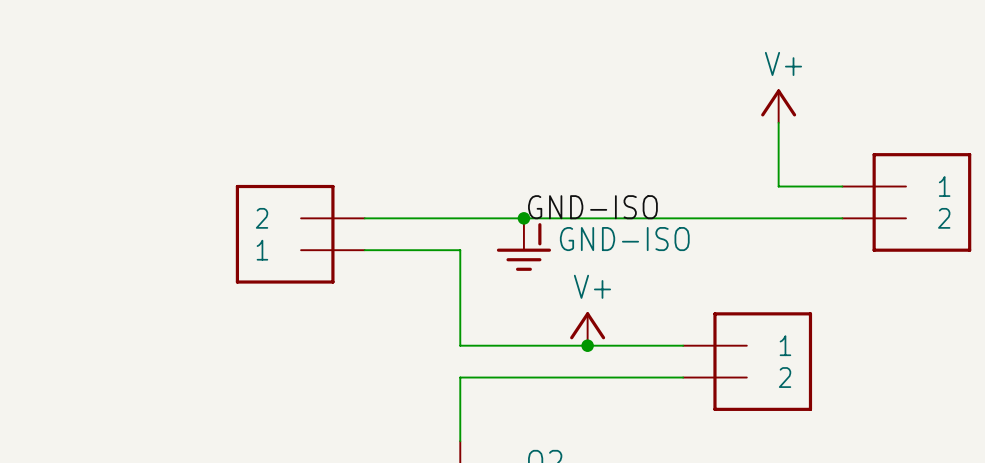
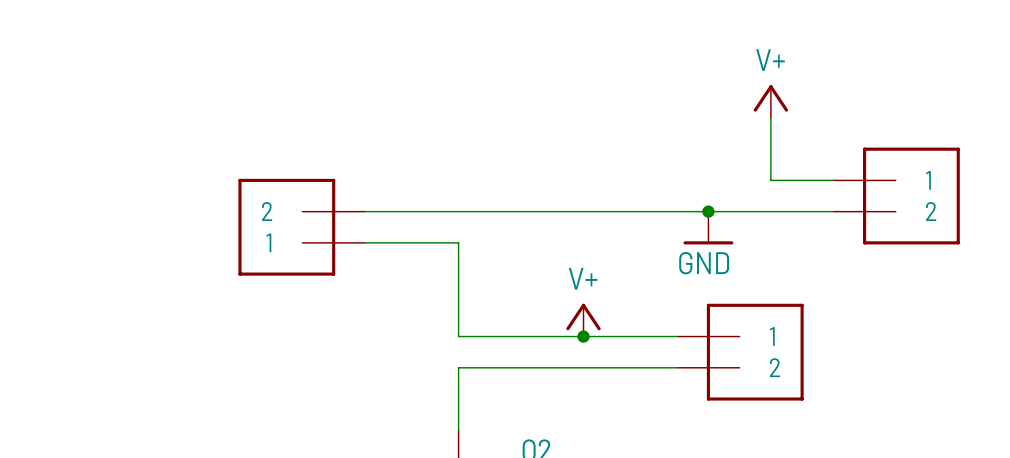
label: GND-ISO (592, 207) -> none
junction: (523, 218) -> none
junction: none -> (708, 211)
power symbol: none -> GND (708, 228)
power symbol: GND-ISO (523, 244) -> none

